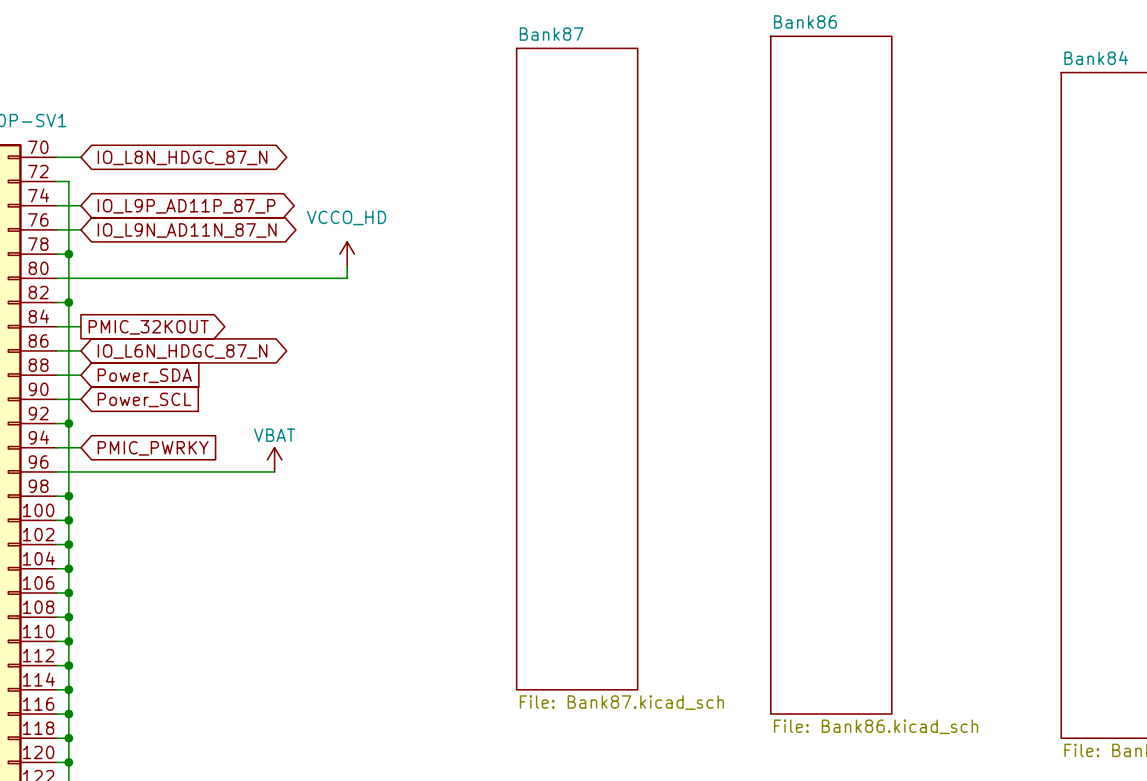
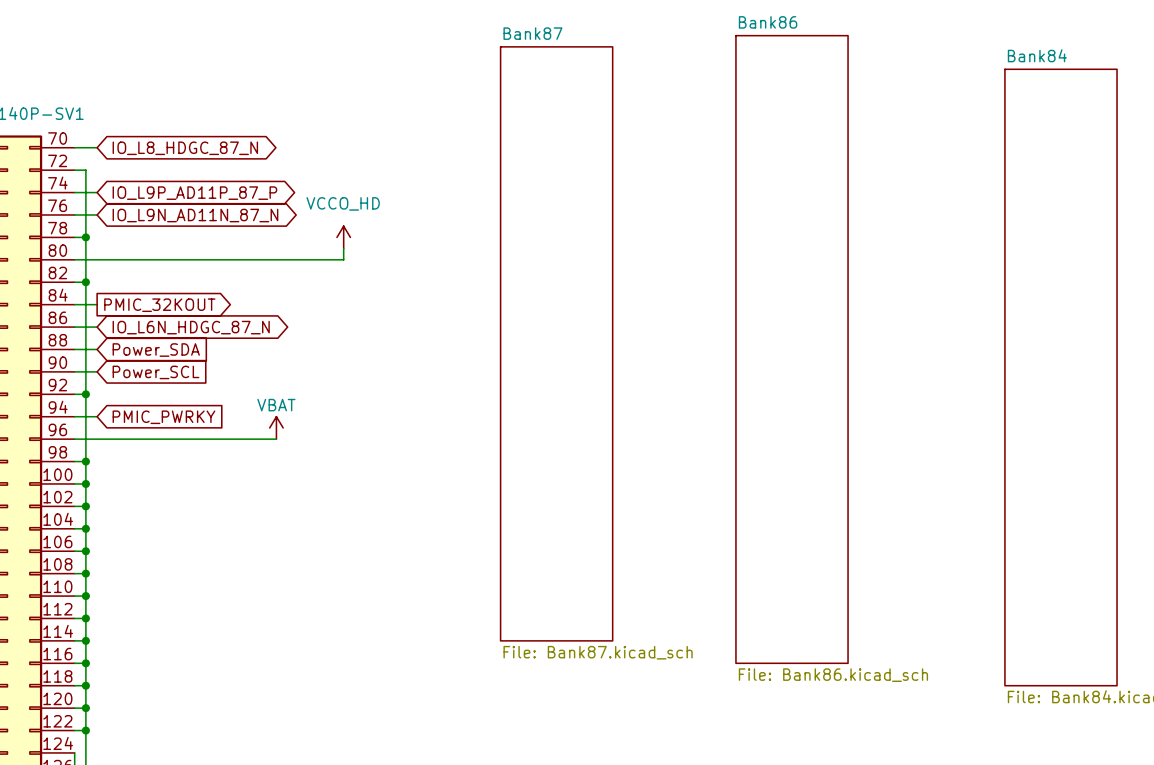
global label: IO_L8N_HDGC_87_N (182, 157) -> IO_L8_HDGC_87_N (185, 148)

